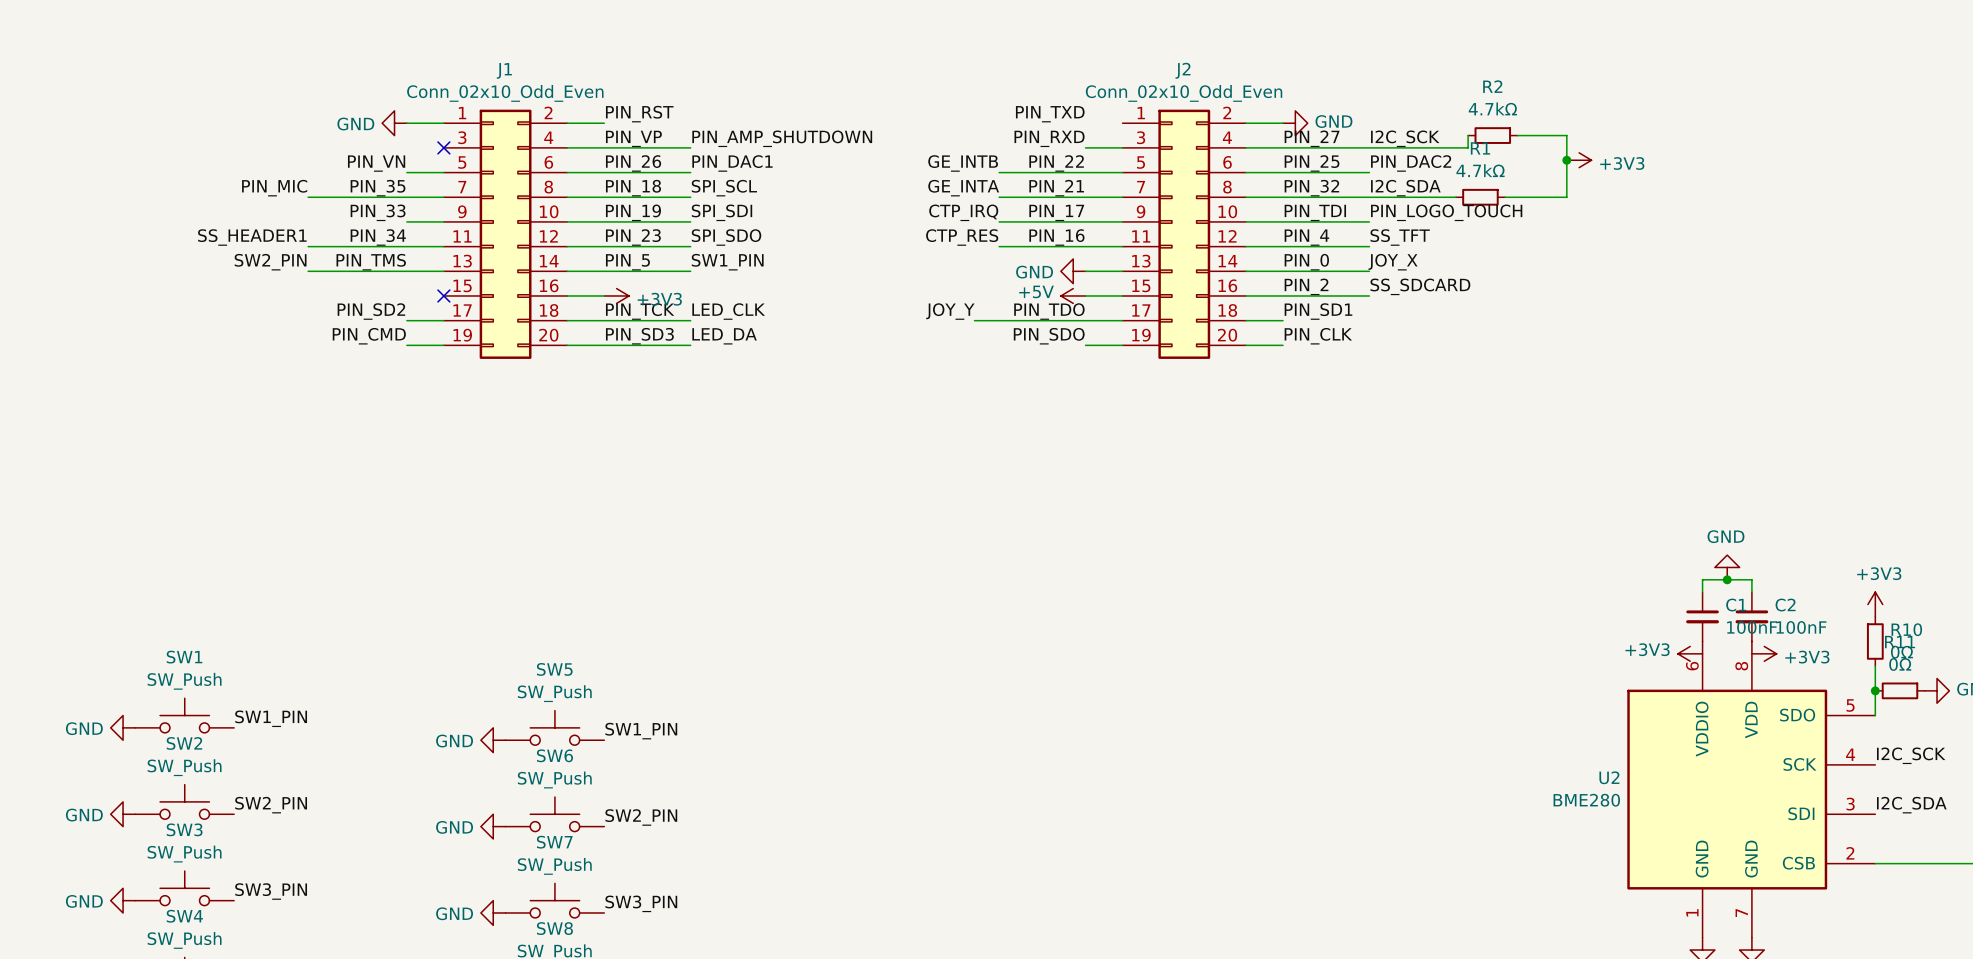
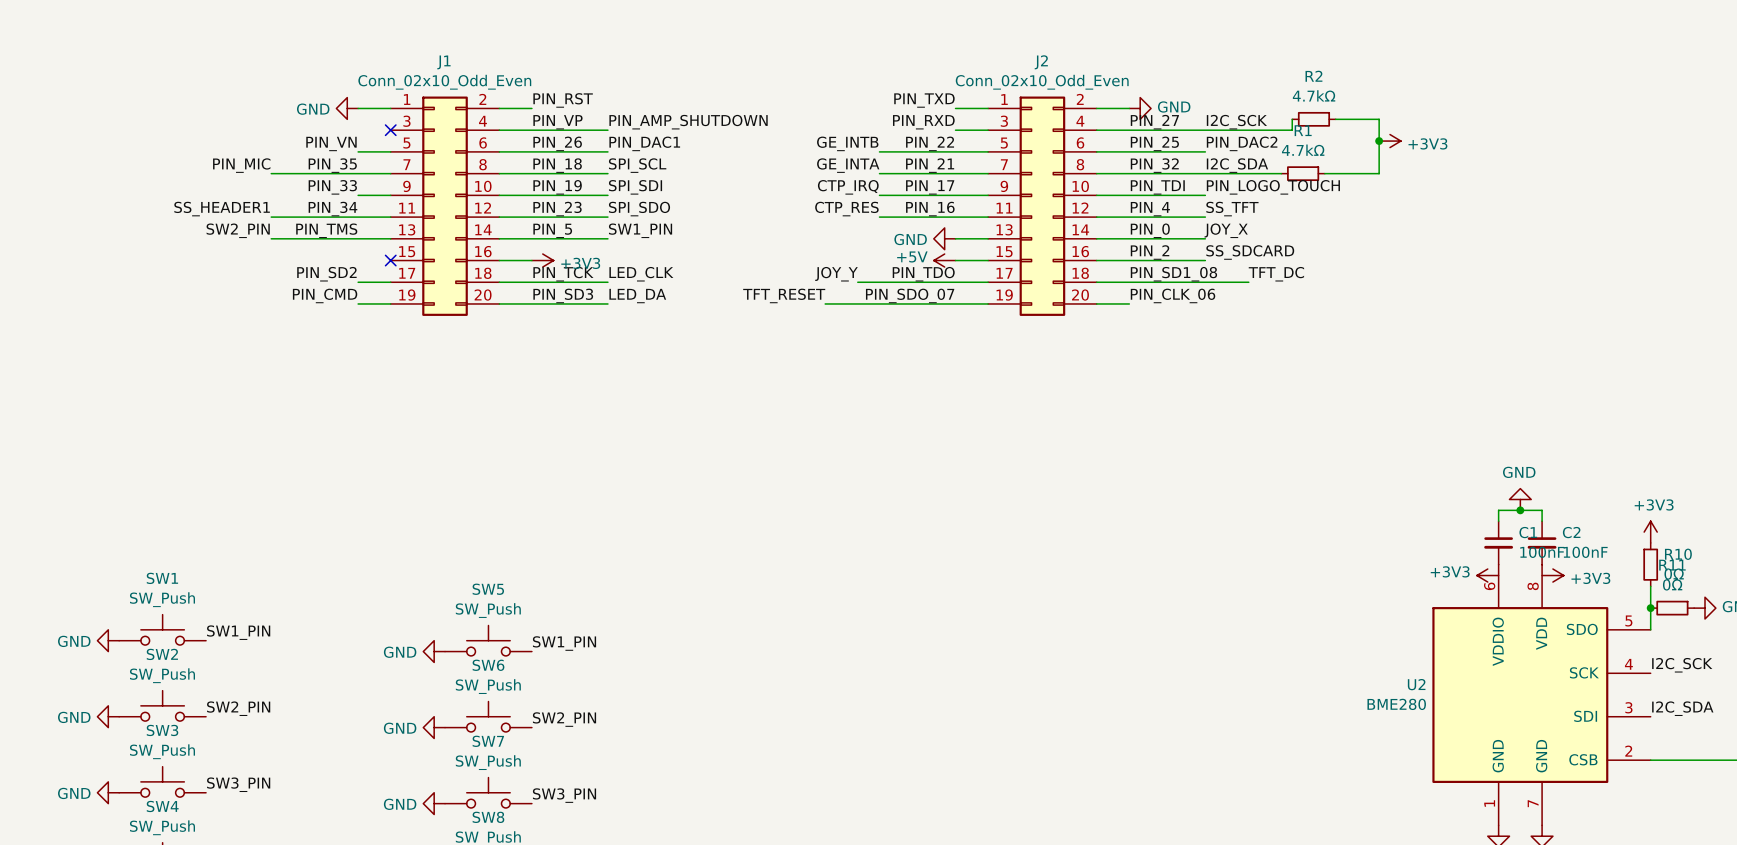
wire: none -> (955, 108) (988, 108)
label: PIN_SD1 (1318, 311) -> PIN_SD1_08 (1173, 274)
label: none -> TFT_DC (1276, 274)
wire: none -> (1129, 282) (1248, 282)
label: none -> TFT_RESET (784, 295)
label: PIN_SDO (1049, 336) -> PIN_SDO_07 (910, 295)
label: PIN_CLK (1318, 336) -> PIN_CLK_06 (1173, 295)
wire: none -> (825, 303) (955, 303)

